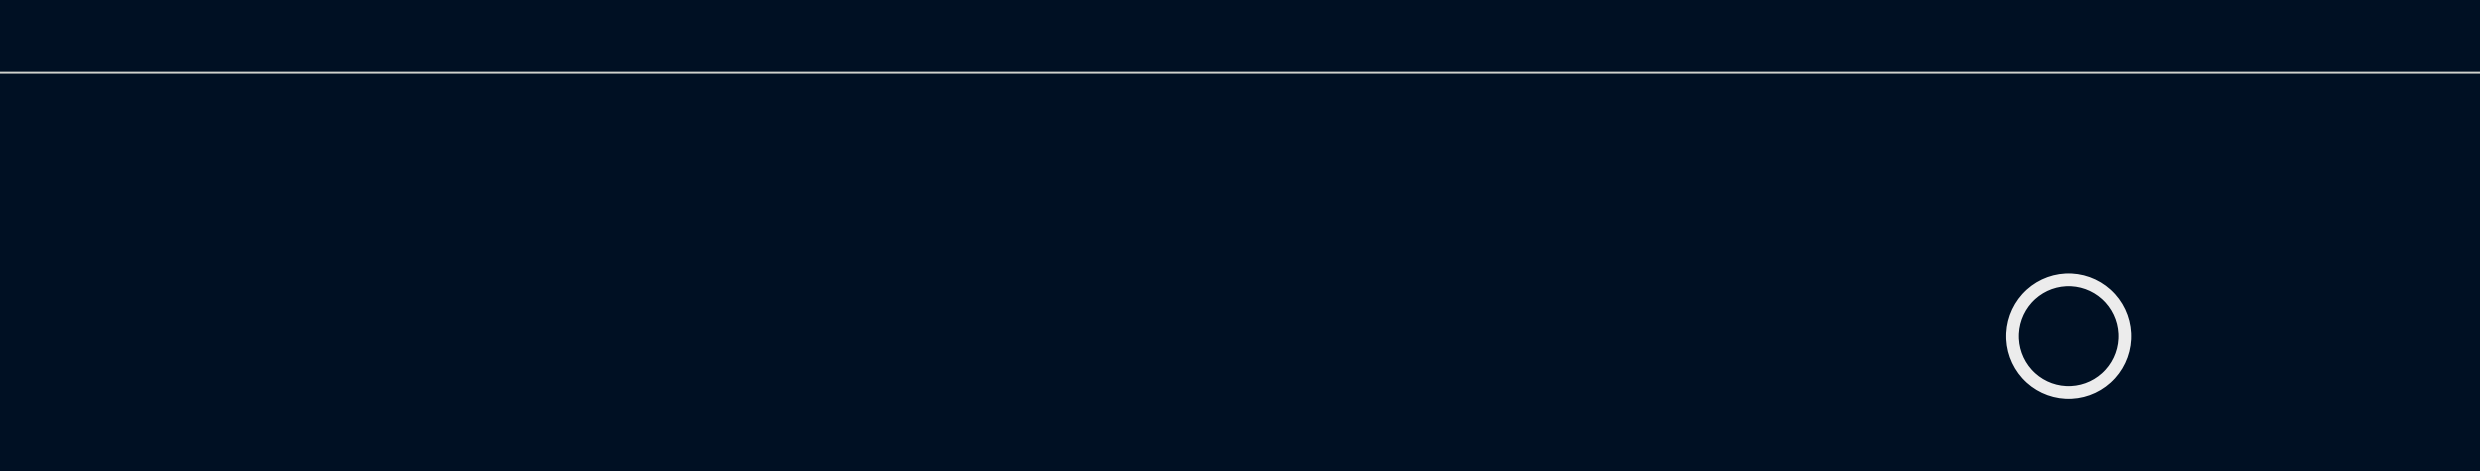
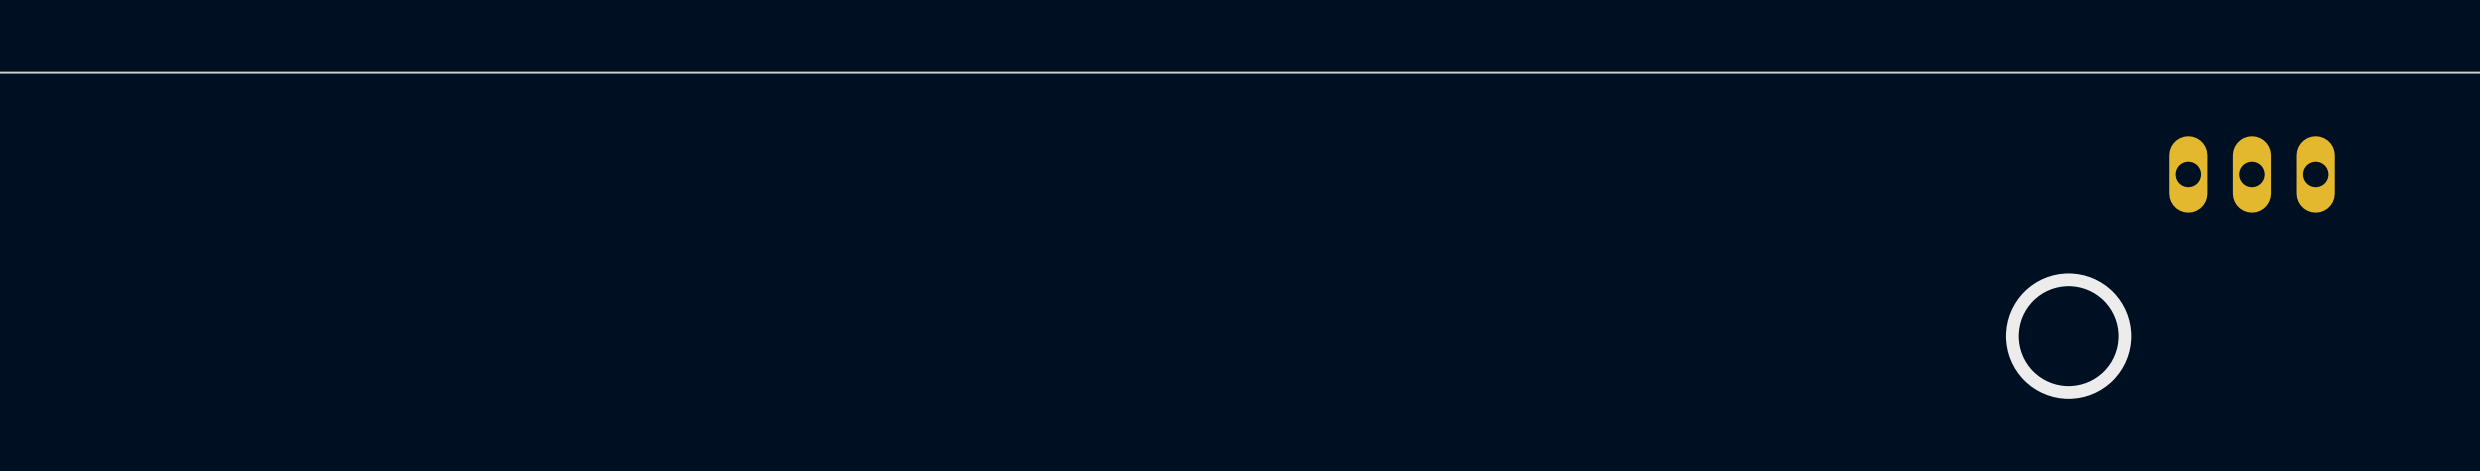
part: none -> (2251, 174)

